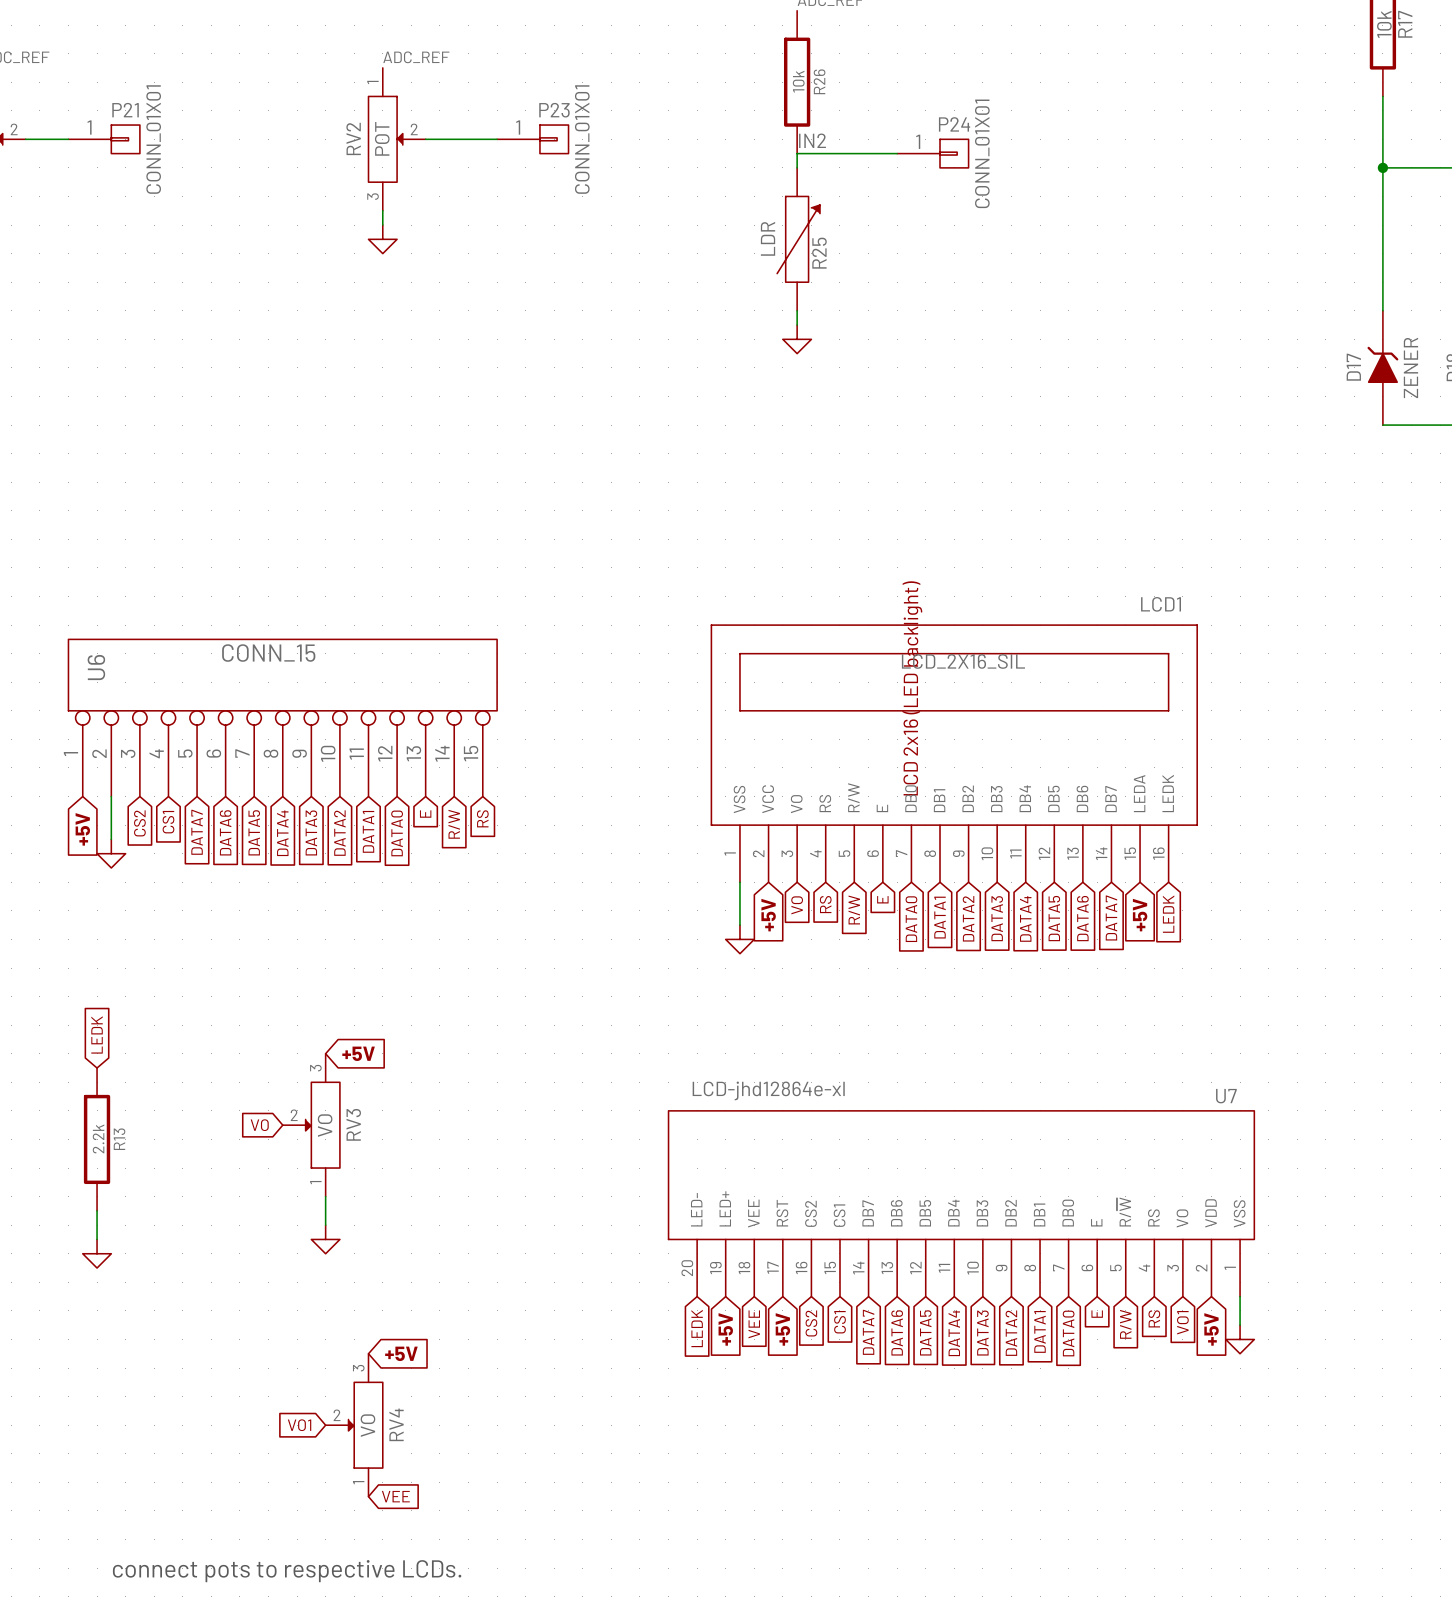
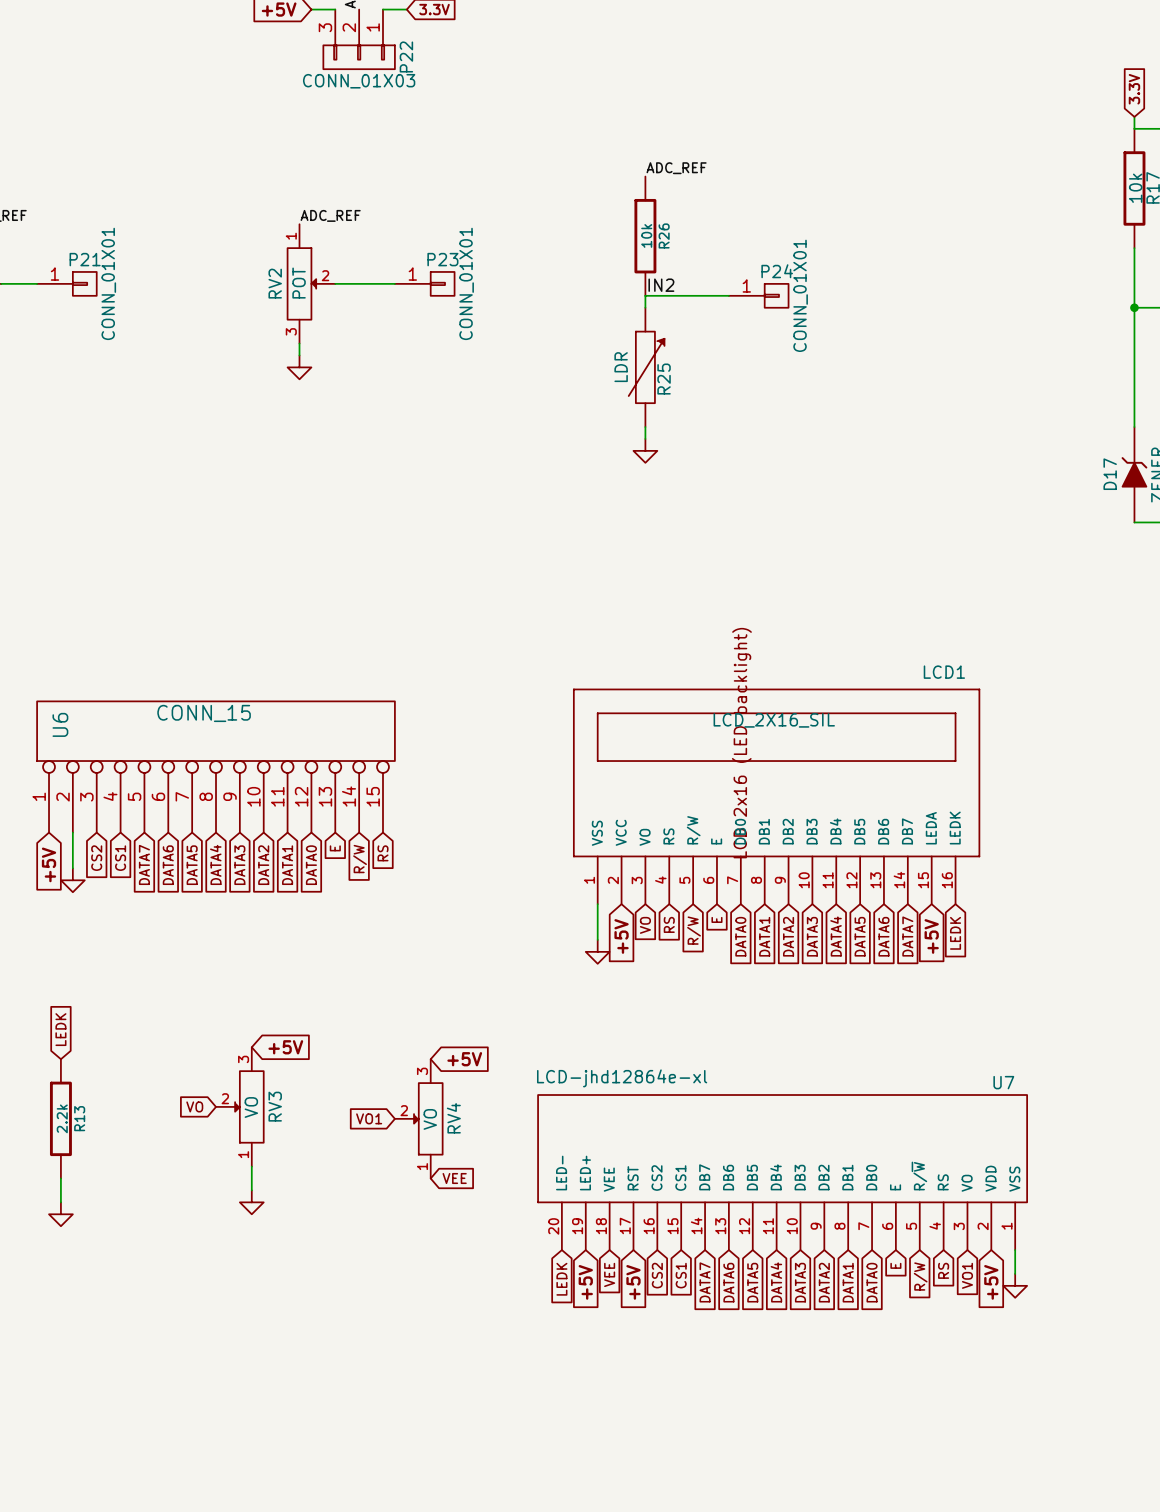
global label: none -> +5V (464, 1059)
global label: none -> VO1 (369, 1118)
global label: none -> VEE (454, 1178)
global label: +5V (401, 1353) -> none
global label: VO1 (299, 1425) -> none
RV4 position: (354, 1425) -> (418, 1118)
global label: VEE (395, 1496) -> none
text: connect pots to respective LCDs. (287, 1571) -> none

